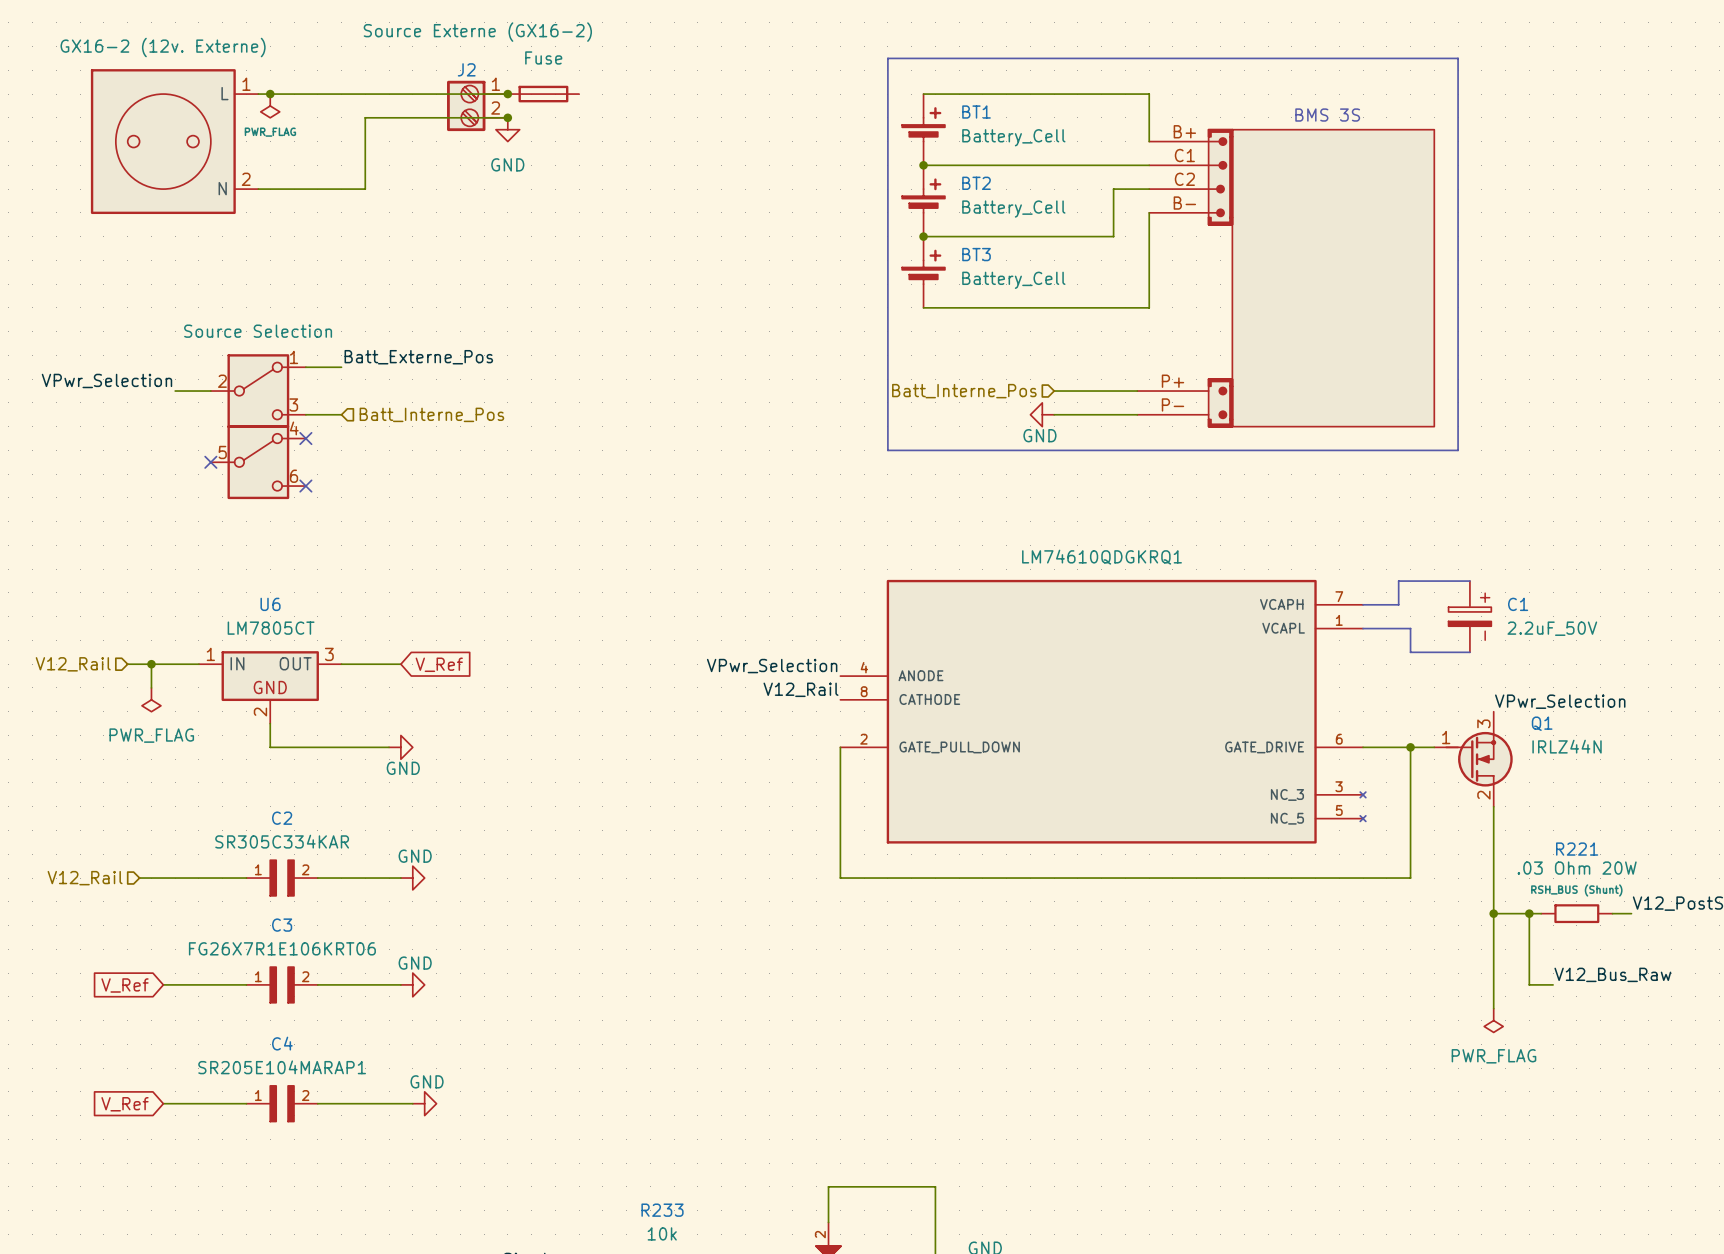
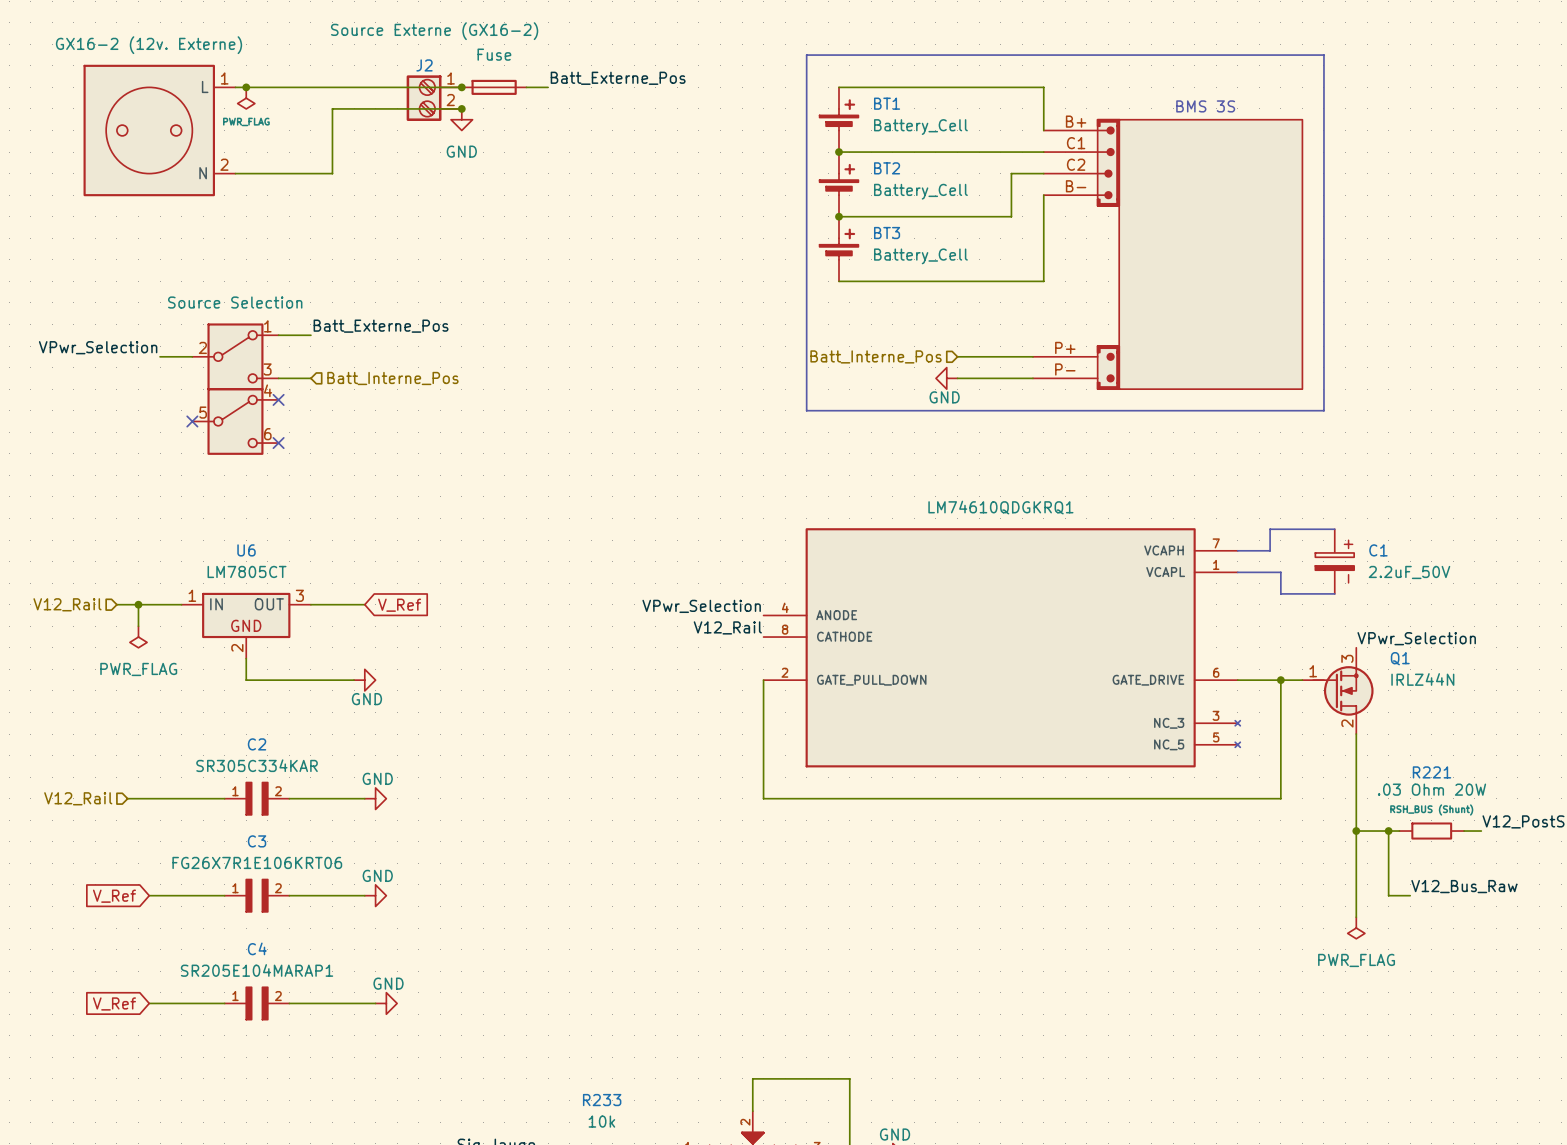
label: none -> Batt_Externe_Pos (618, 78)
wire: none -> (526, 87) (548, 87)

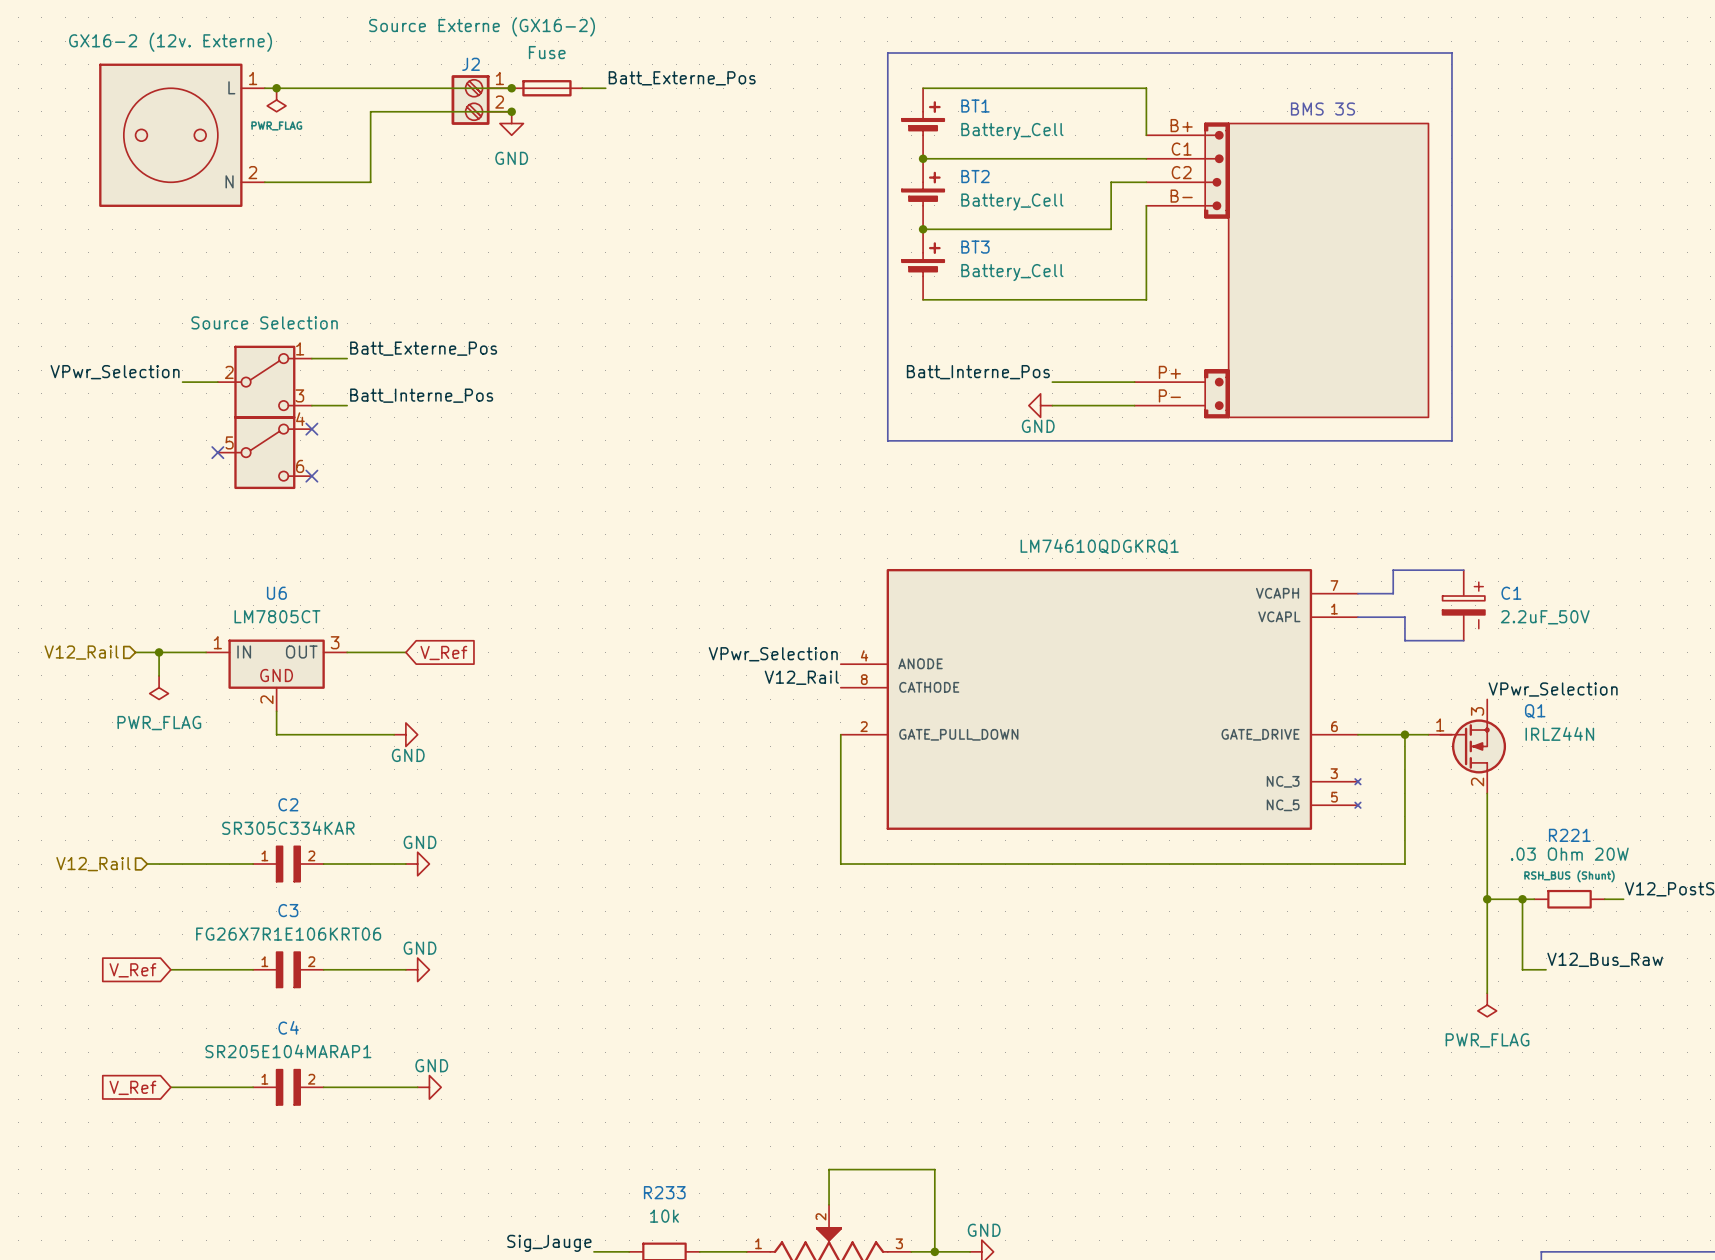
label: none -> Batt_Interne_Pos (978, 372)
hierarchical label: Batt_Interne_Pos (876, 356) -> none
label: none -> Batt_Interne_Pos (421, 395)
hierarchical label: Batt_Interne_Pos (392, 378) -> none

